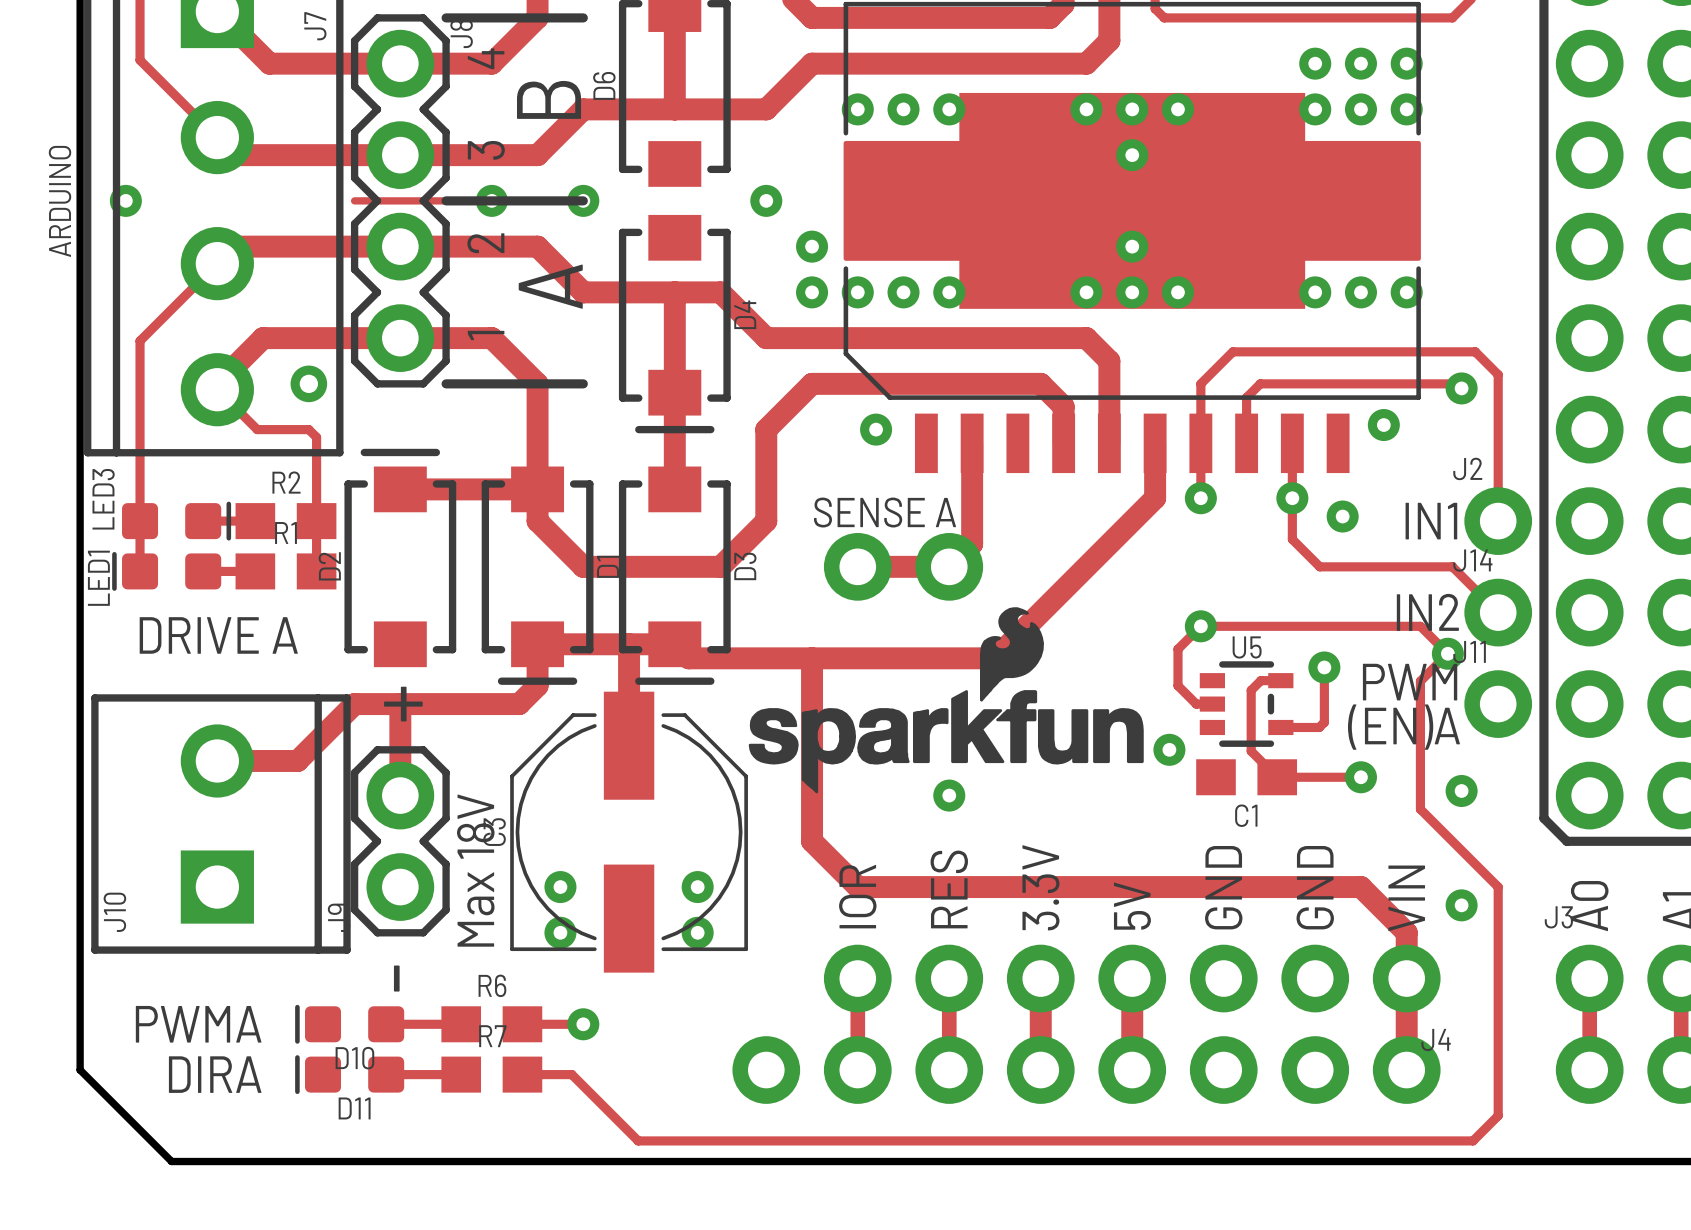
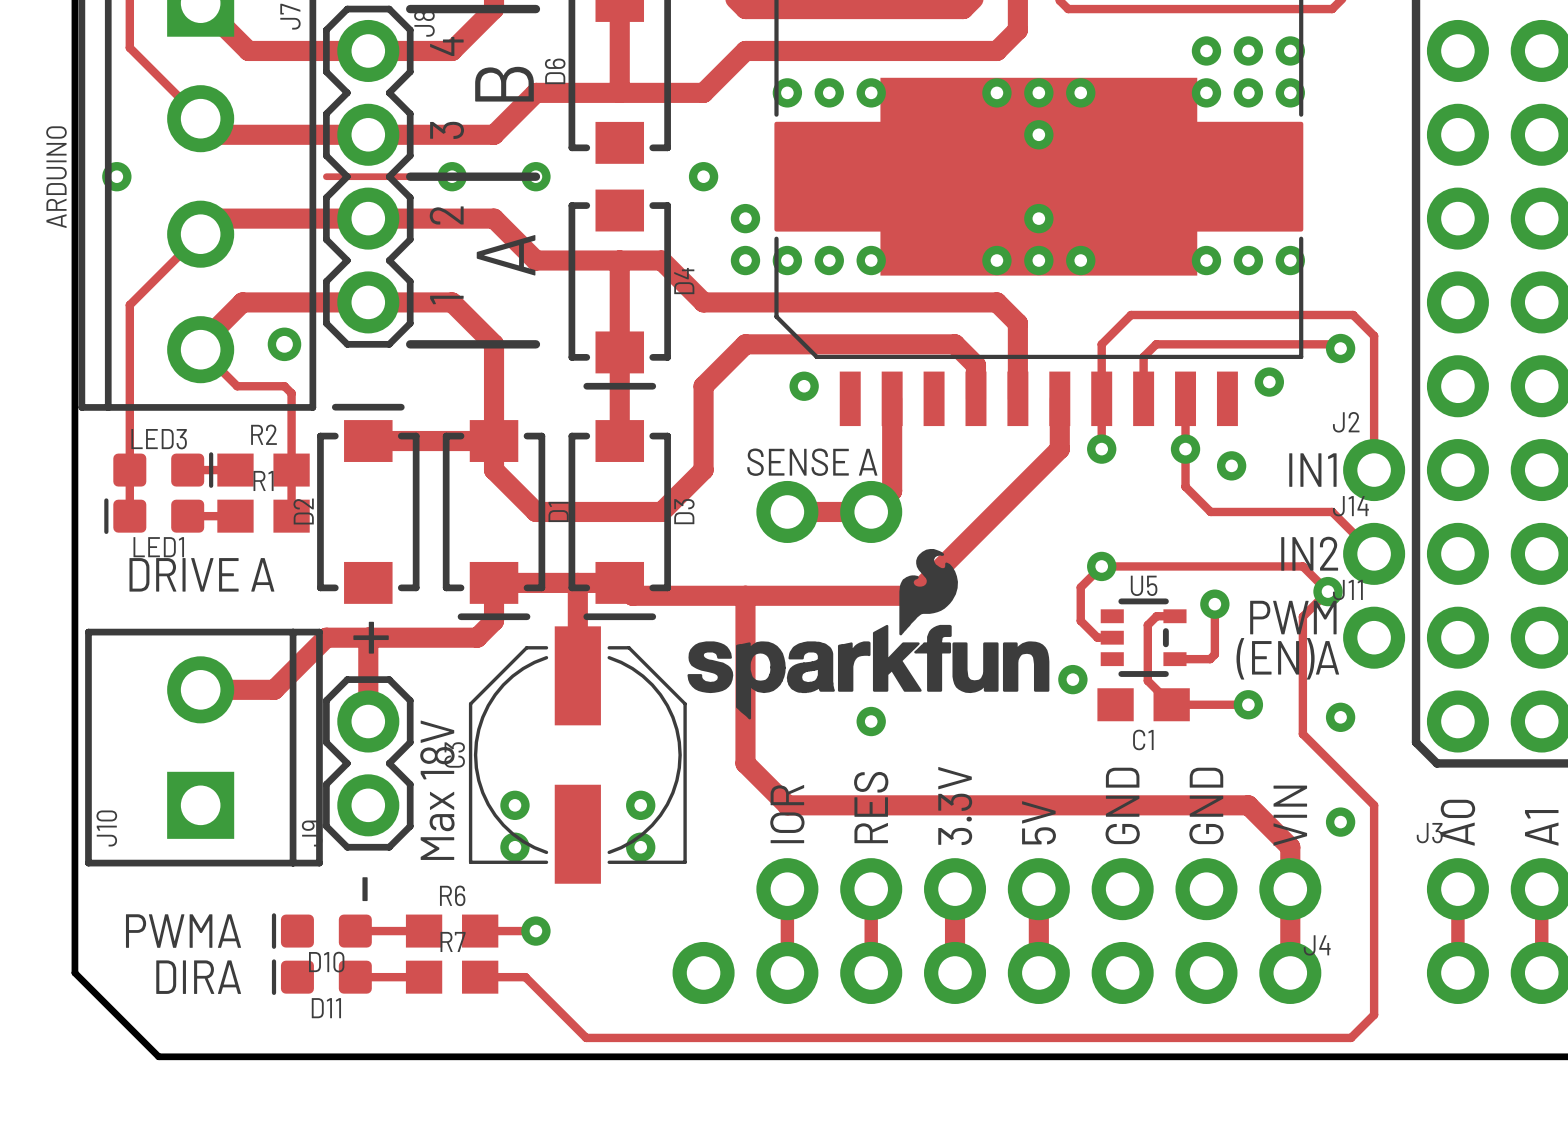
LED3 name rotation: 0° (103, 499) -> 90° clockwise (159, 439)
LED1 name rotation: 0° (98, 578) -> 90° clockwise (158, 547)

